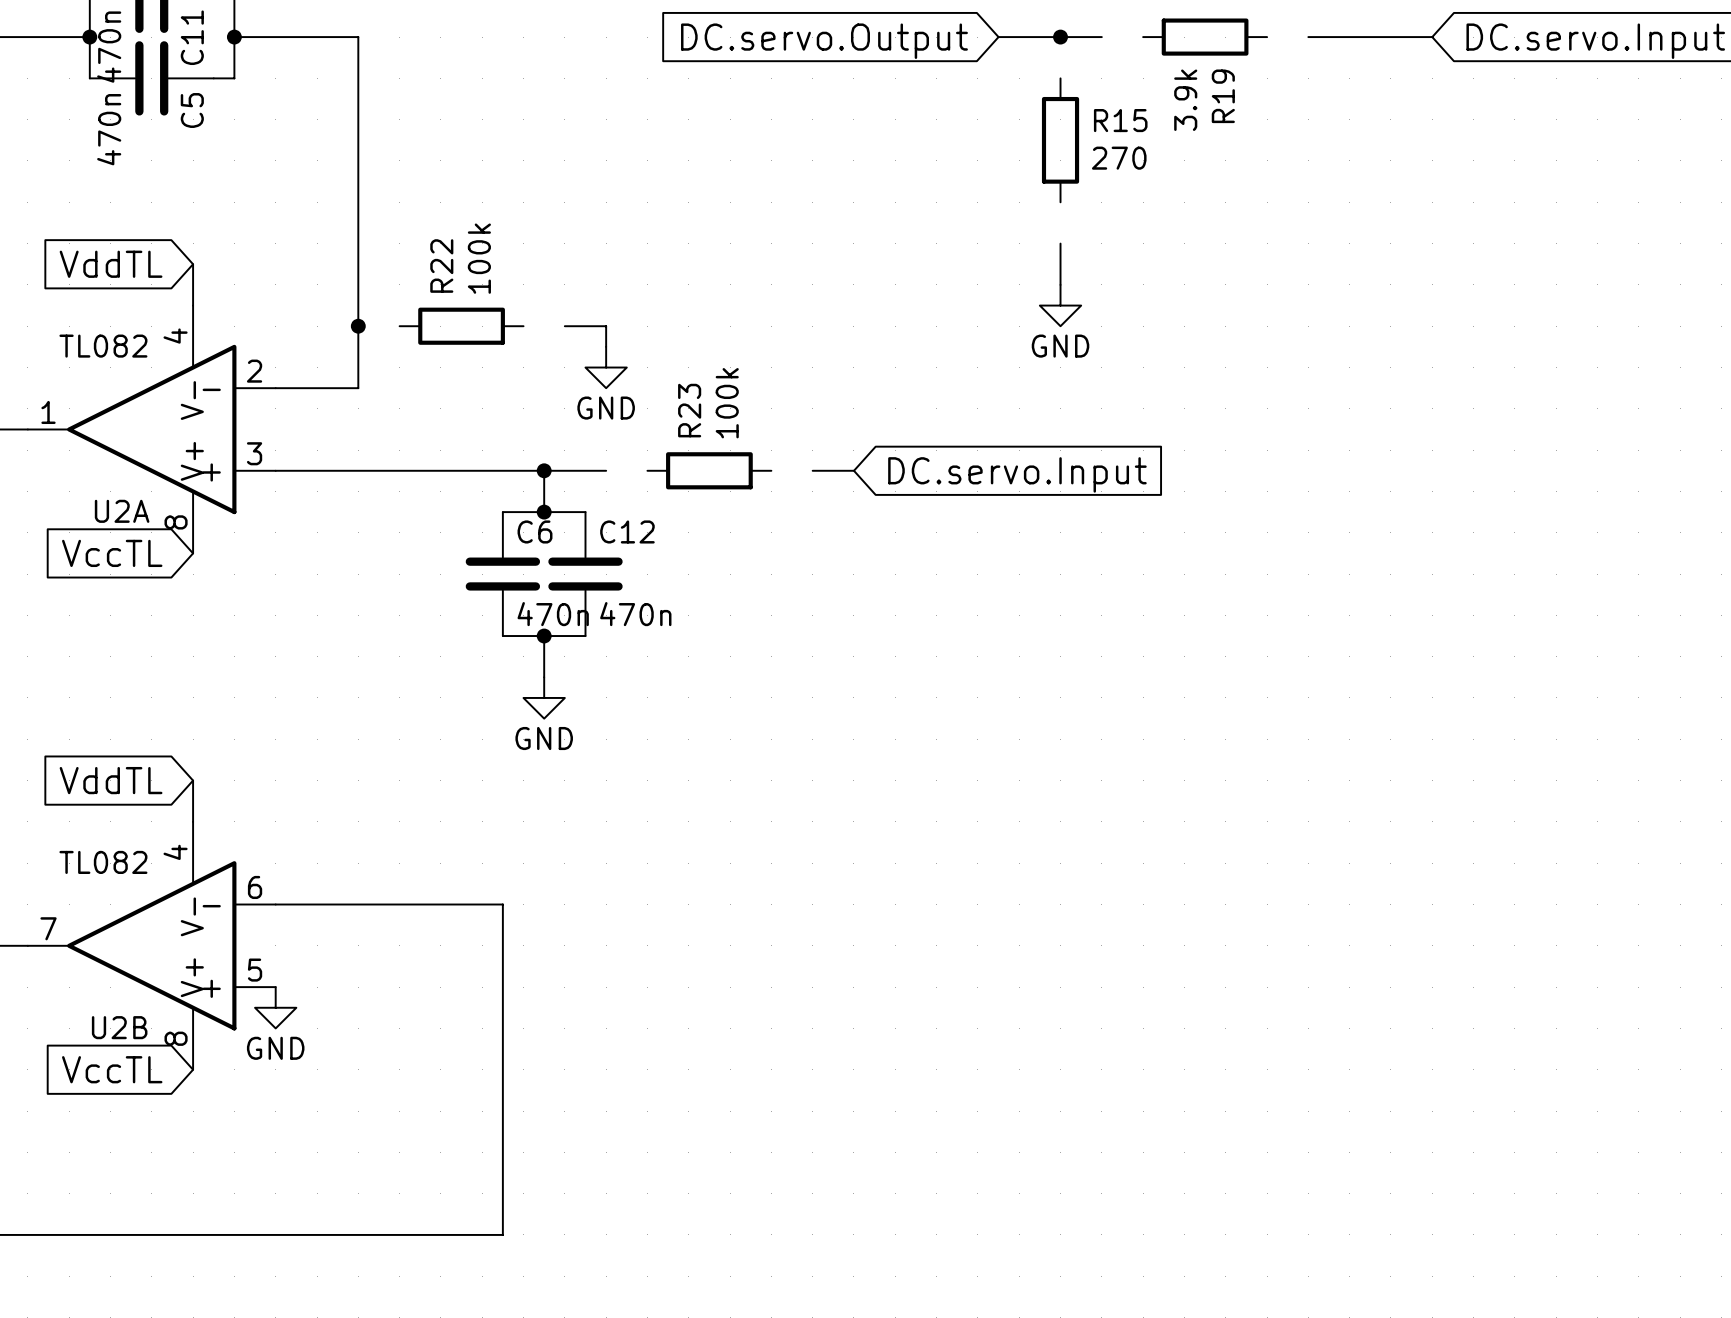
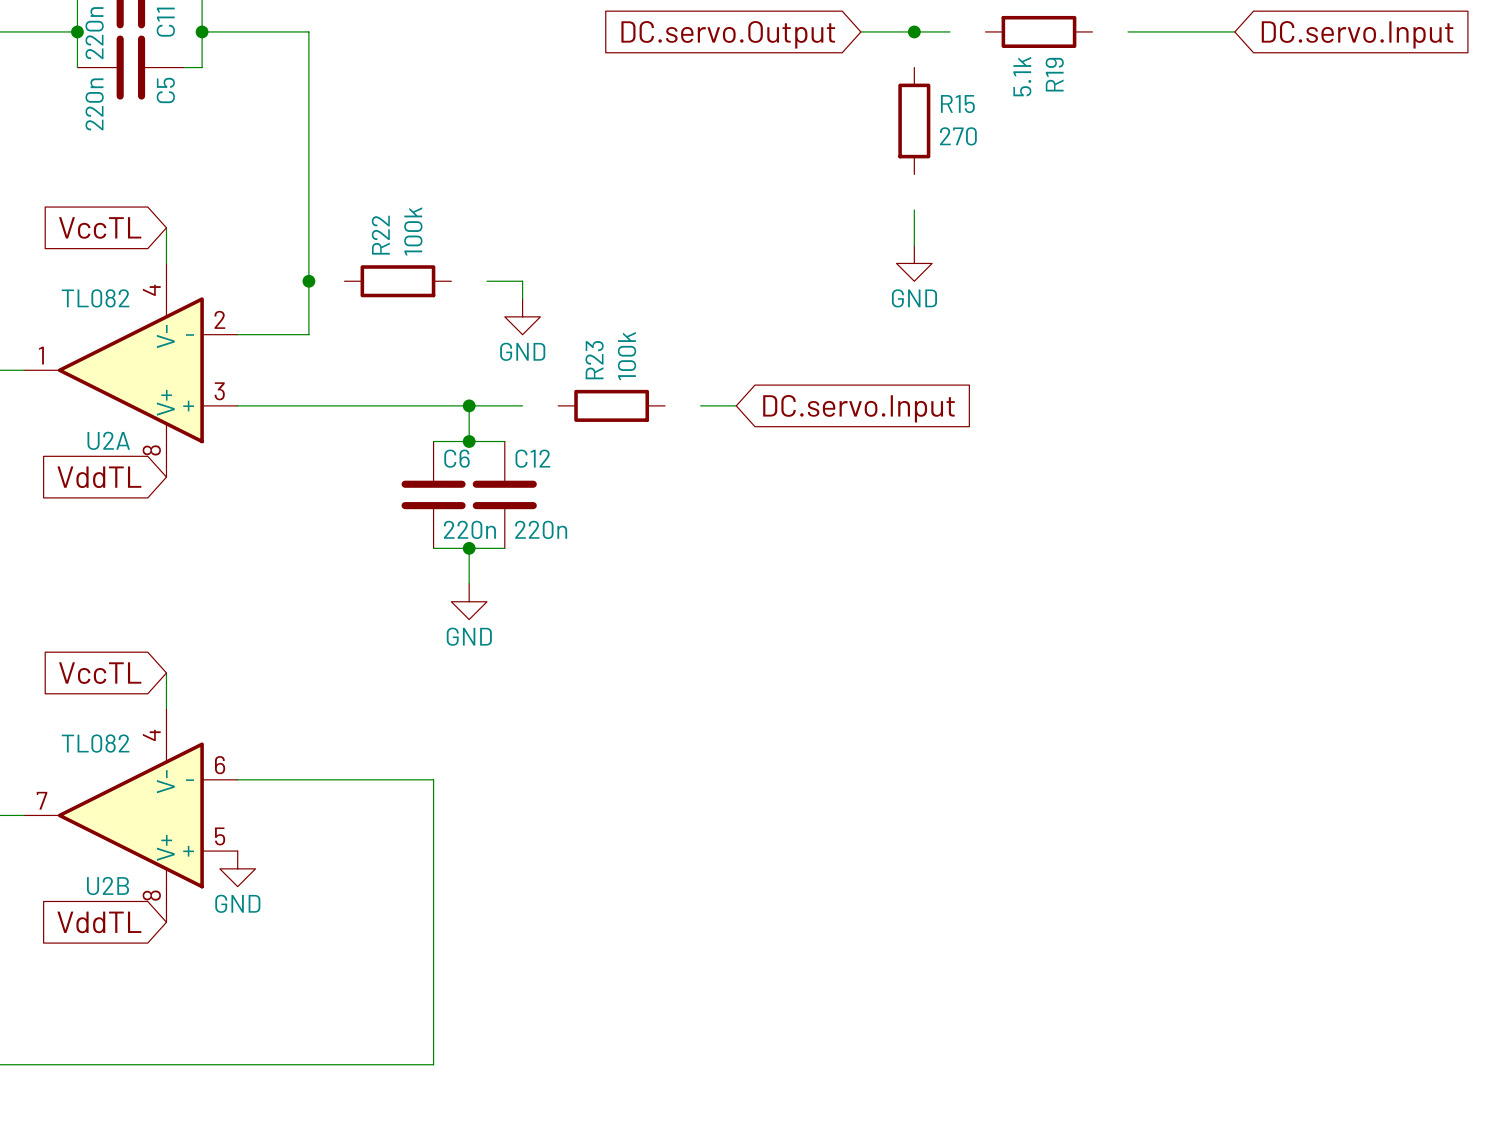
C11 value: 470n (109, 47) -> 220n (94, 33)
R19 value: 3.9k (1185, 100) -> 5.1k (1022, 76)
C5 value: 470n (109, 129) -> 220n (94, 104)
global label: VddTL (111, 264) -> VccTL (100, 227)
global label: VccTL (112, 553) -> VddTL (99, 477)
C6 value: 470n (553, 614) -> 220n (469, 529)
C12 value: 470n (635, 614) -> 220n (541, 529)
global label: VddTL (111, 780) -> VccTL (100, 673)
global label: VccTL (112, 1069) -> VddTL (99, 922)

